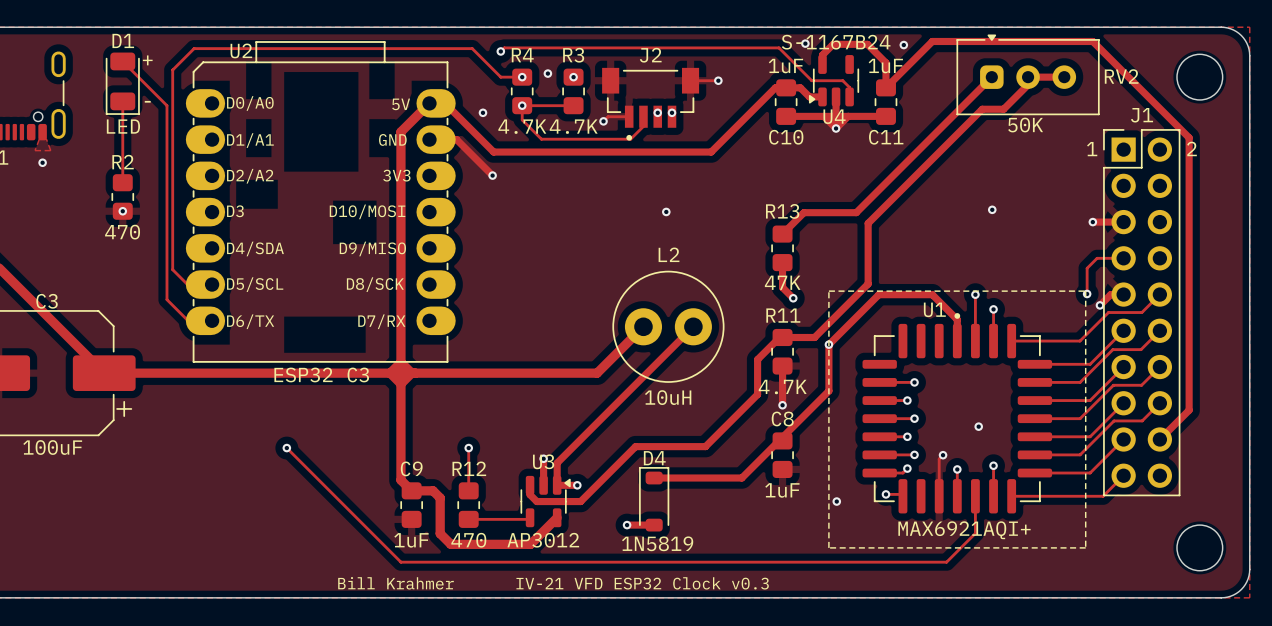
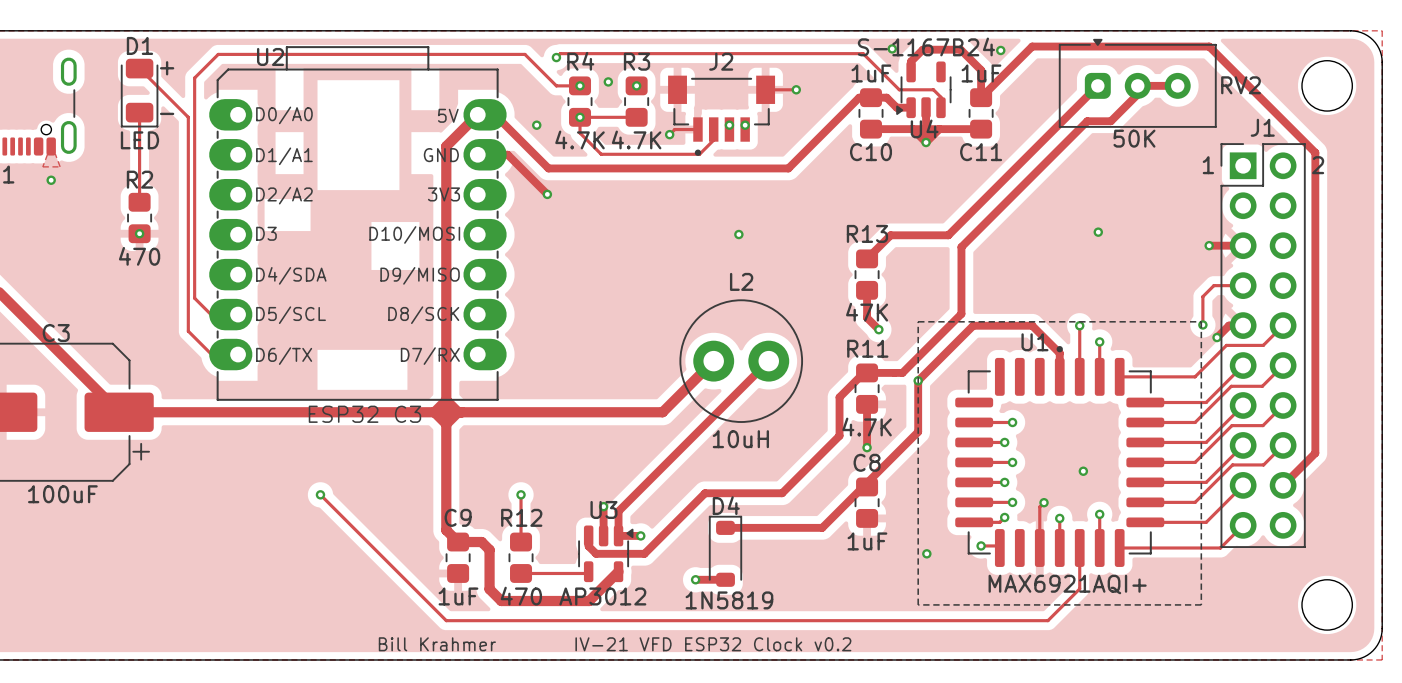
text: IV-21 VFD ESP32 Clock v0.3 (642, 583) -> IV-21 VFD ESP32 Clock v0.2 (713, 644)

